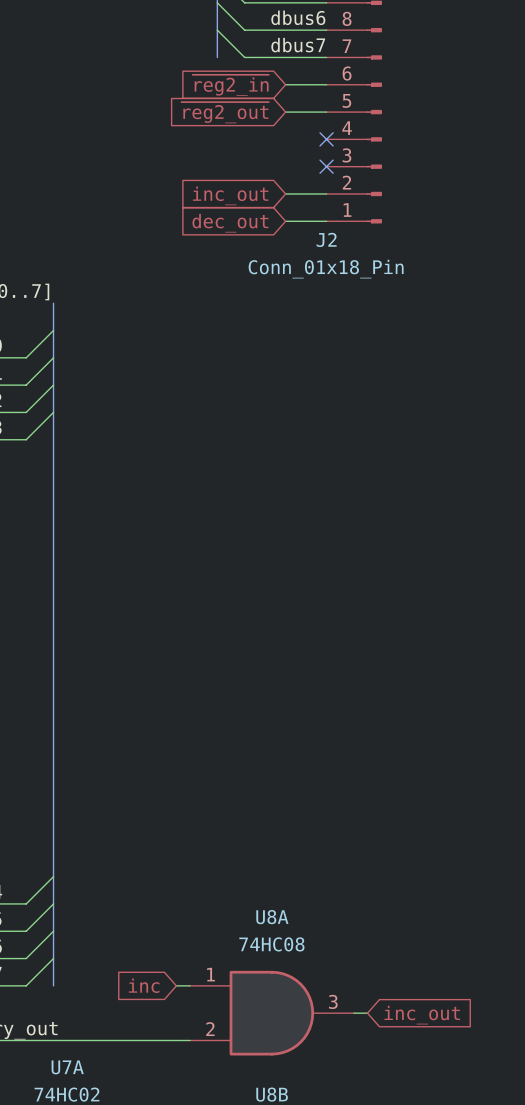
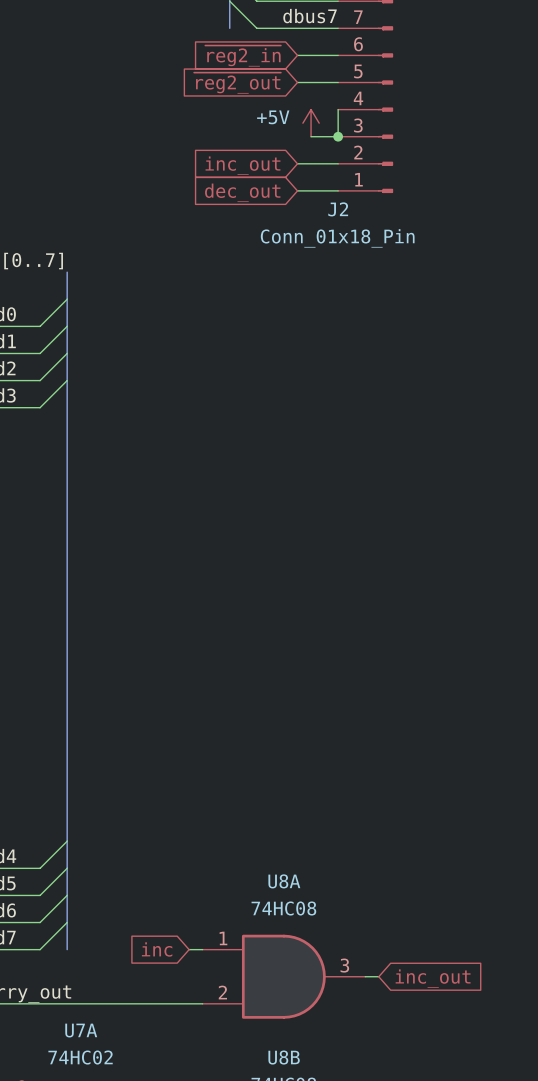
wire: none -> (338, 109) (338, 136) (311, 136)
no-connect mark: (326, 139) -> none
power symbol: none -> +5V (311, 123)
no-connect mark: (326, 166) -> none
junction: none -> (338, 136)

